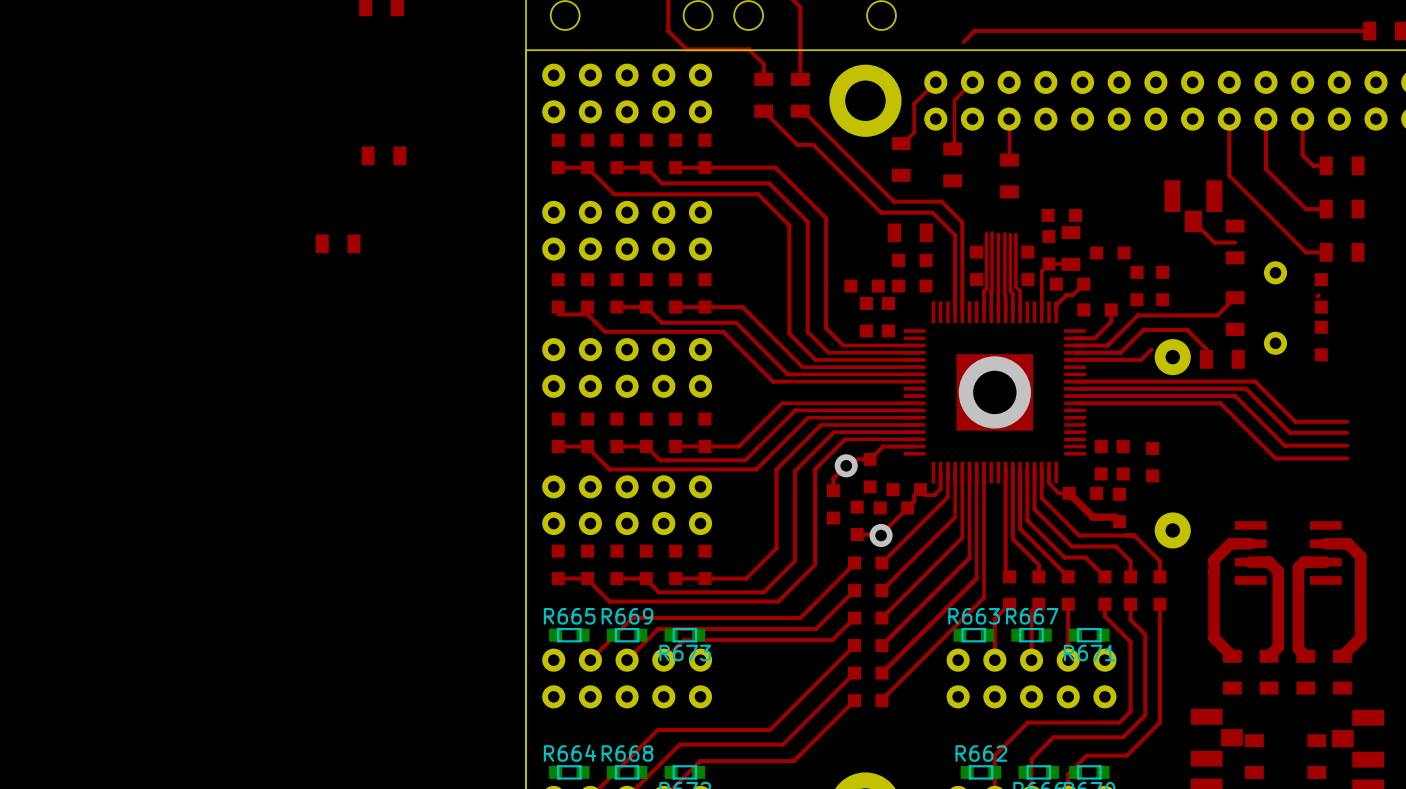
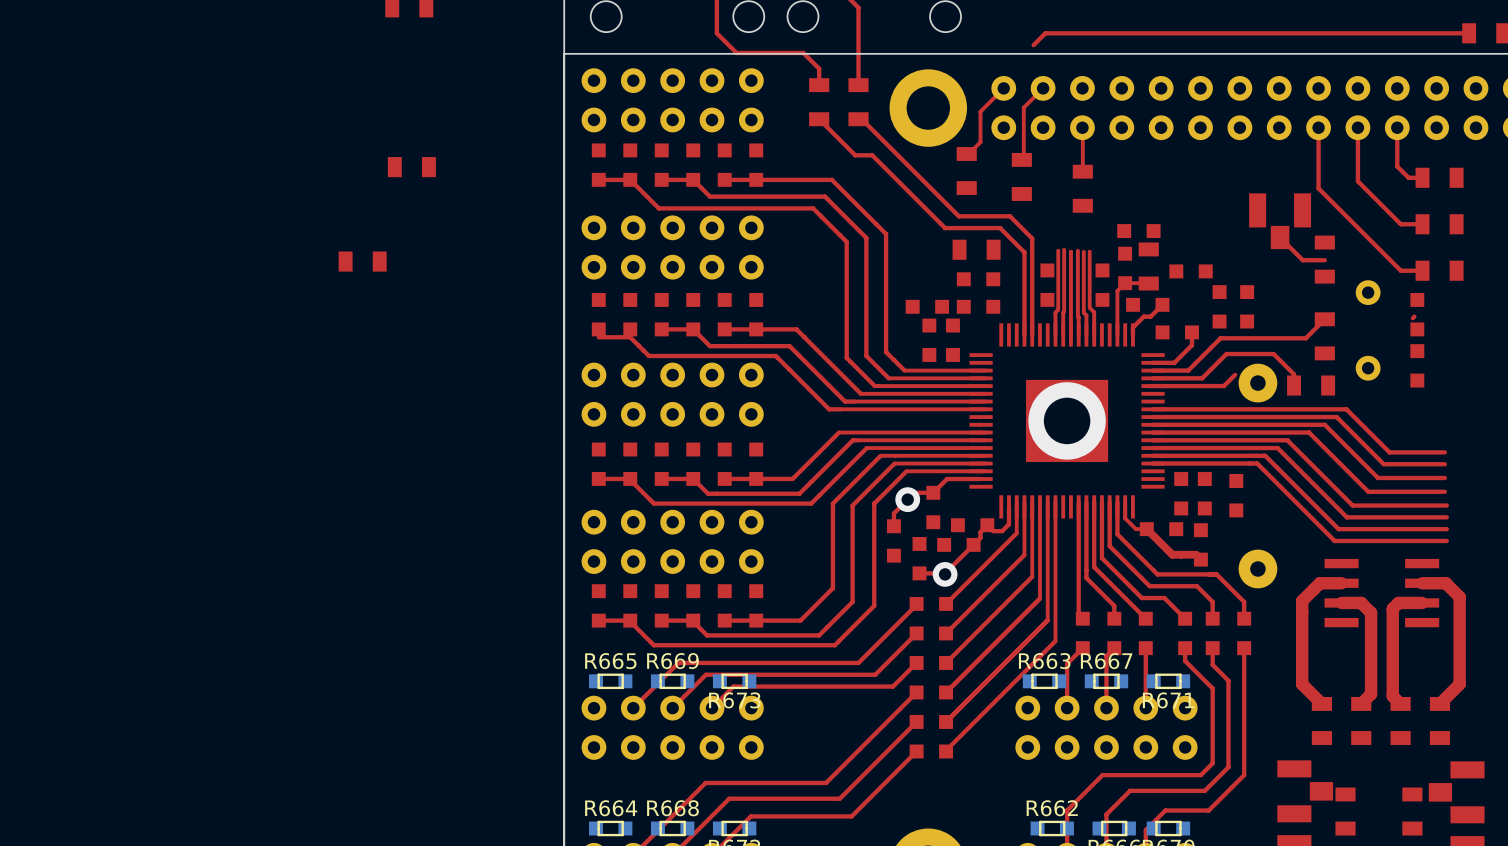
top track: none -> (1153, 440) (1287, 440) (1352, 505) (1446, 505)
top track: none -> (1153, 448) (1277, 448) (1346, 517) (1446, 517)
top track: none -> (1153, 455) (1265, 455) (1338, 529) (1446, 529)
top track: none -> (1153, 463) (1257, 463) (1334, 540) (1446, 540)

